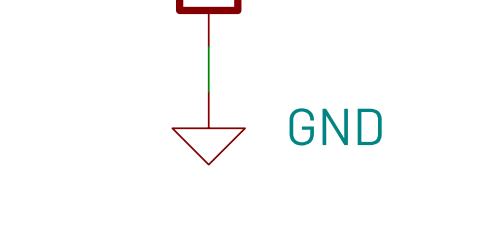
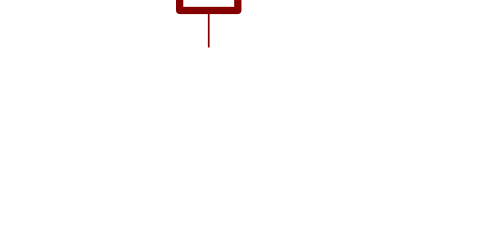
wire: (208, 46) (208, 91) -> none
power symbol: GND (208, 128) -> none

